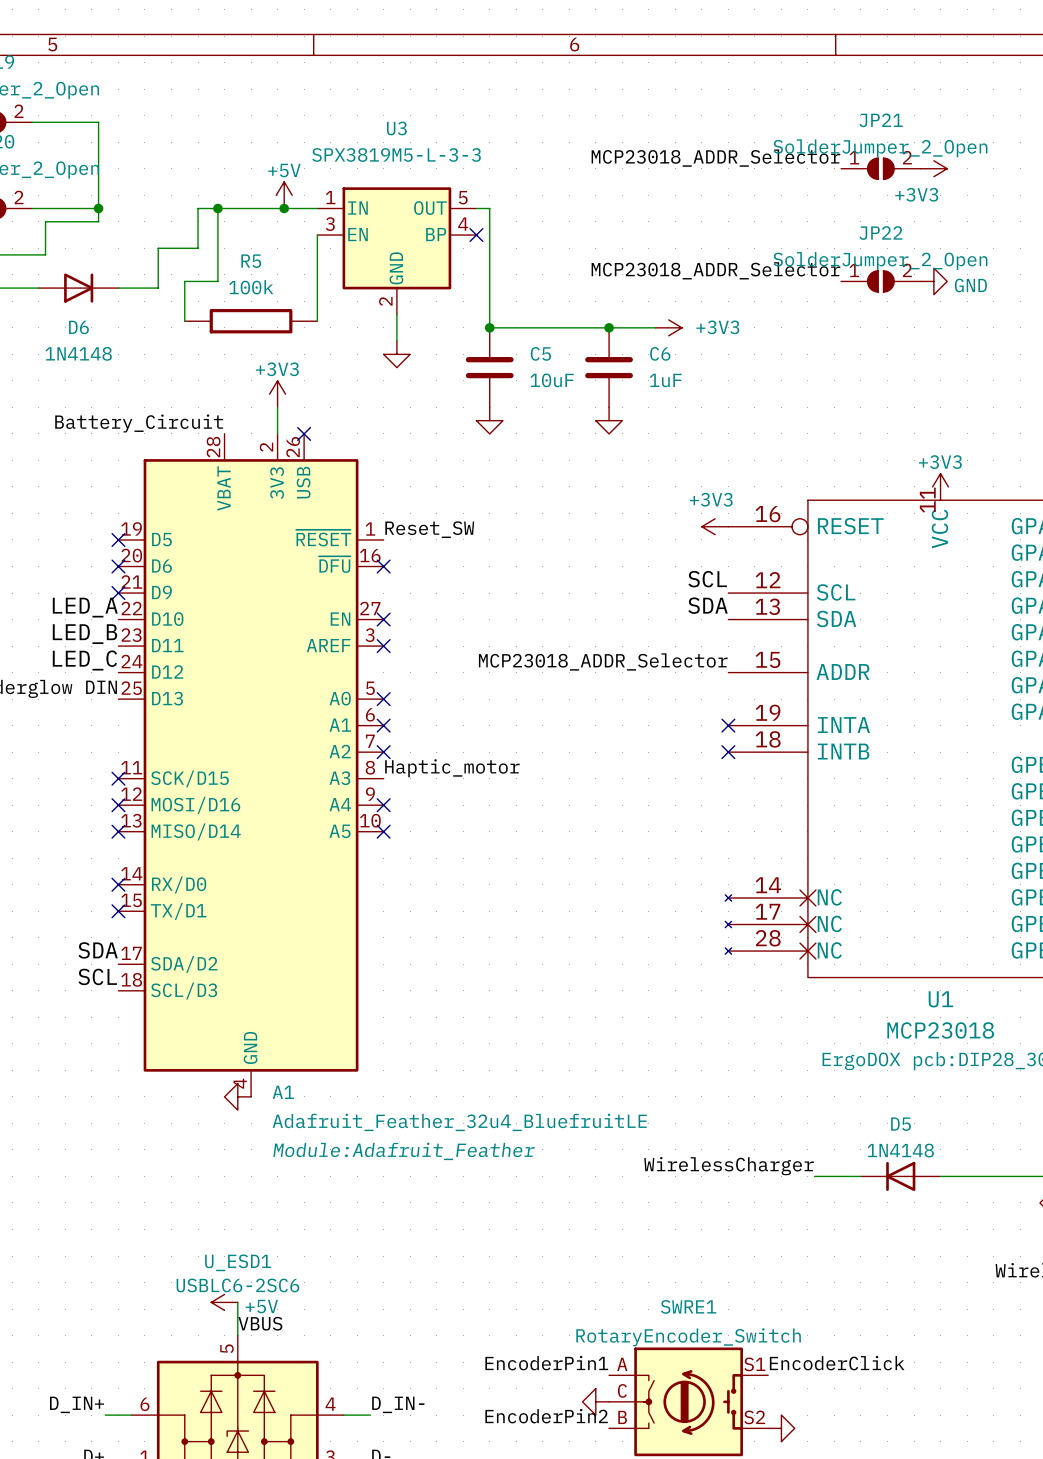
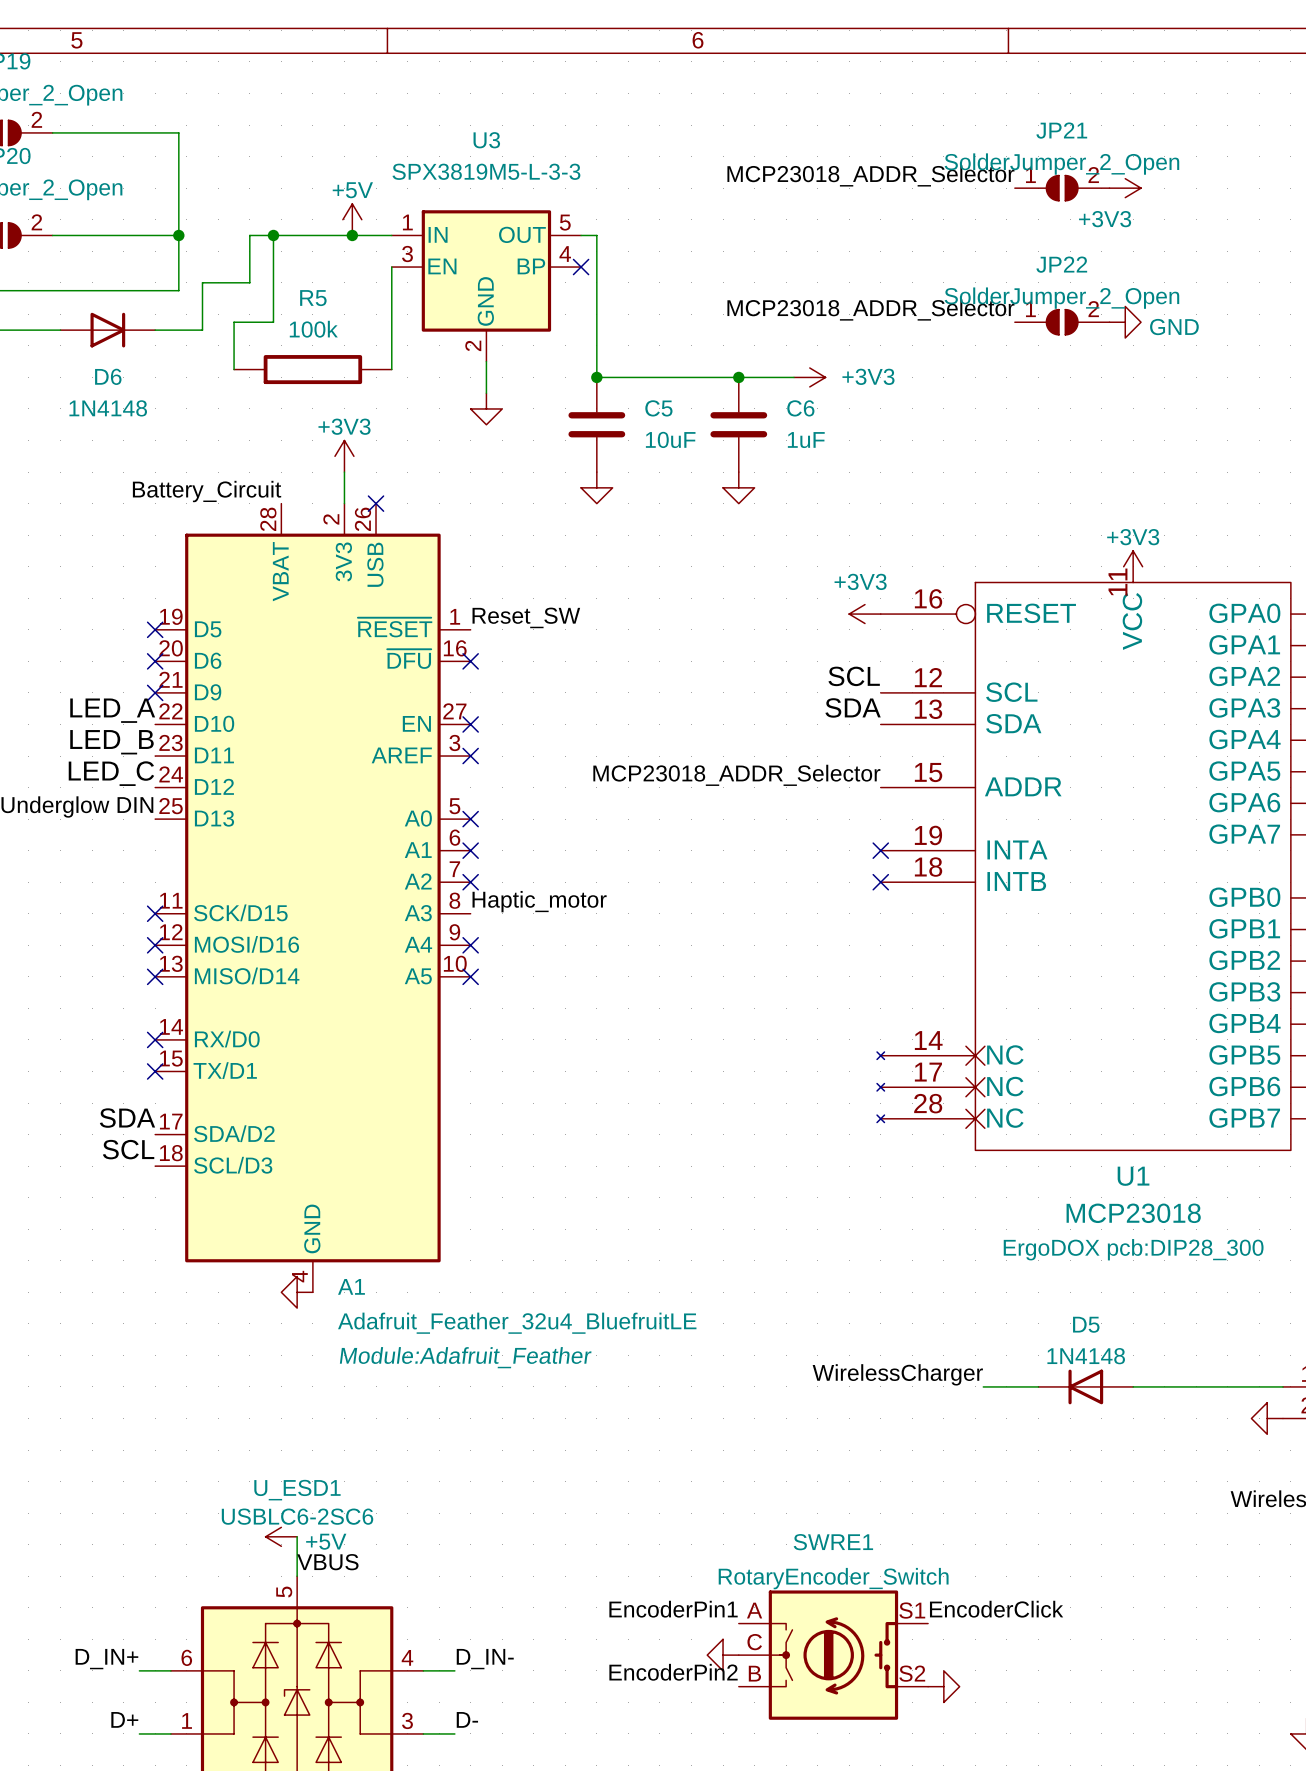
wire: (98, 122) (98, 221) (45, 221) (45, 254) -> (131, 132) (178, 132) (178, 290) (68, 290)
wire: none -> (131, 235) (178, 235)
junction position: (98, 208) -> (178, 235)

